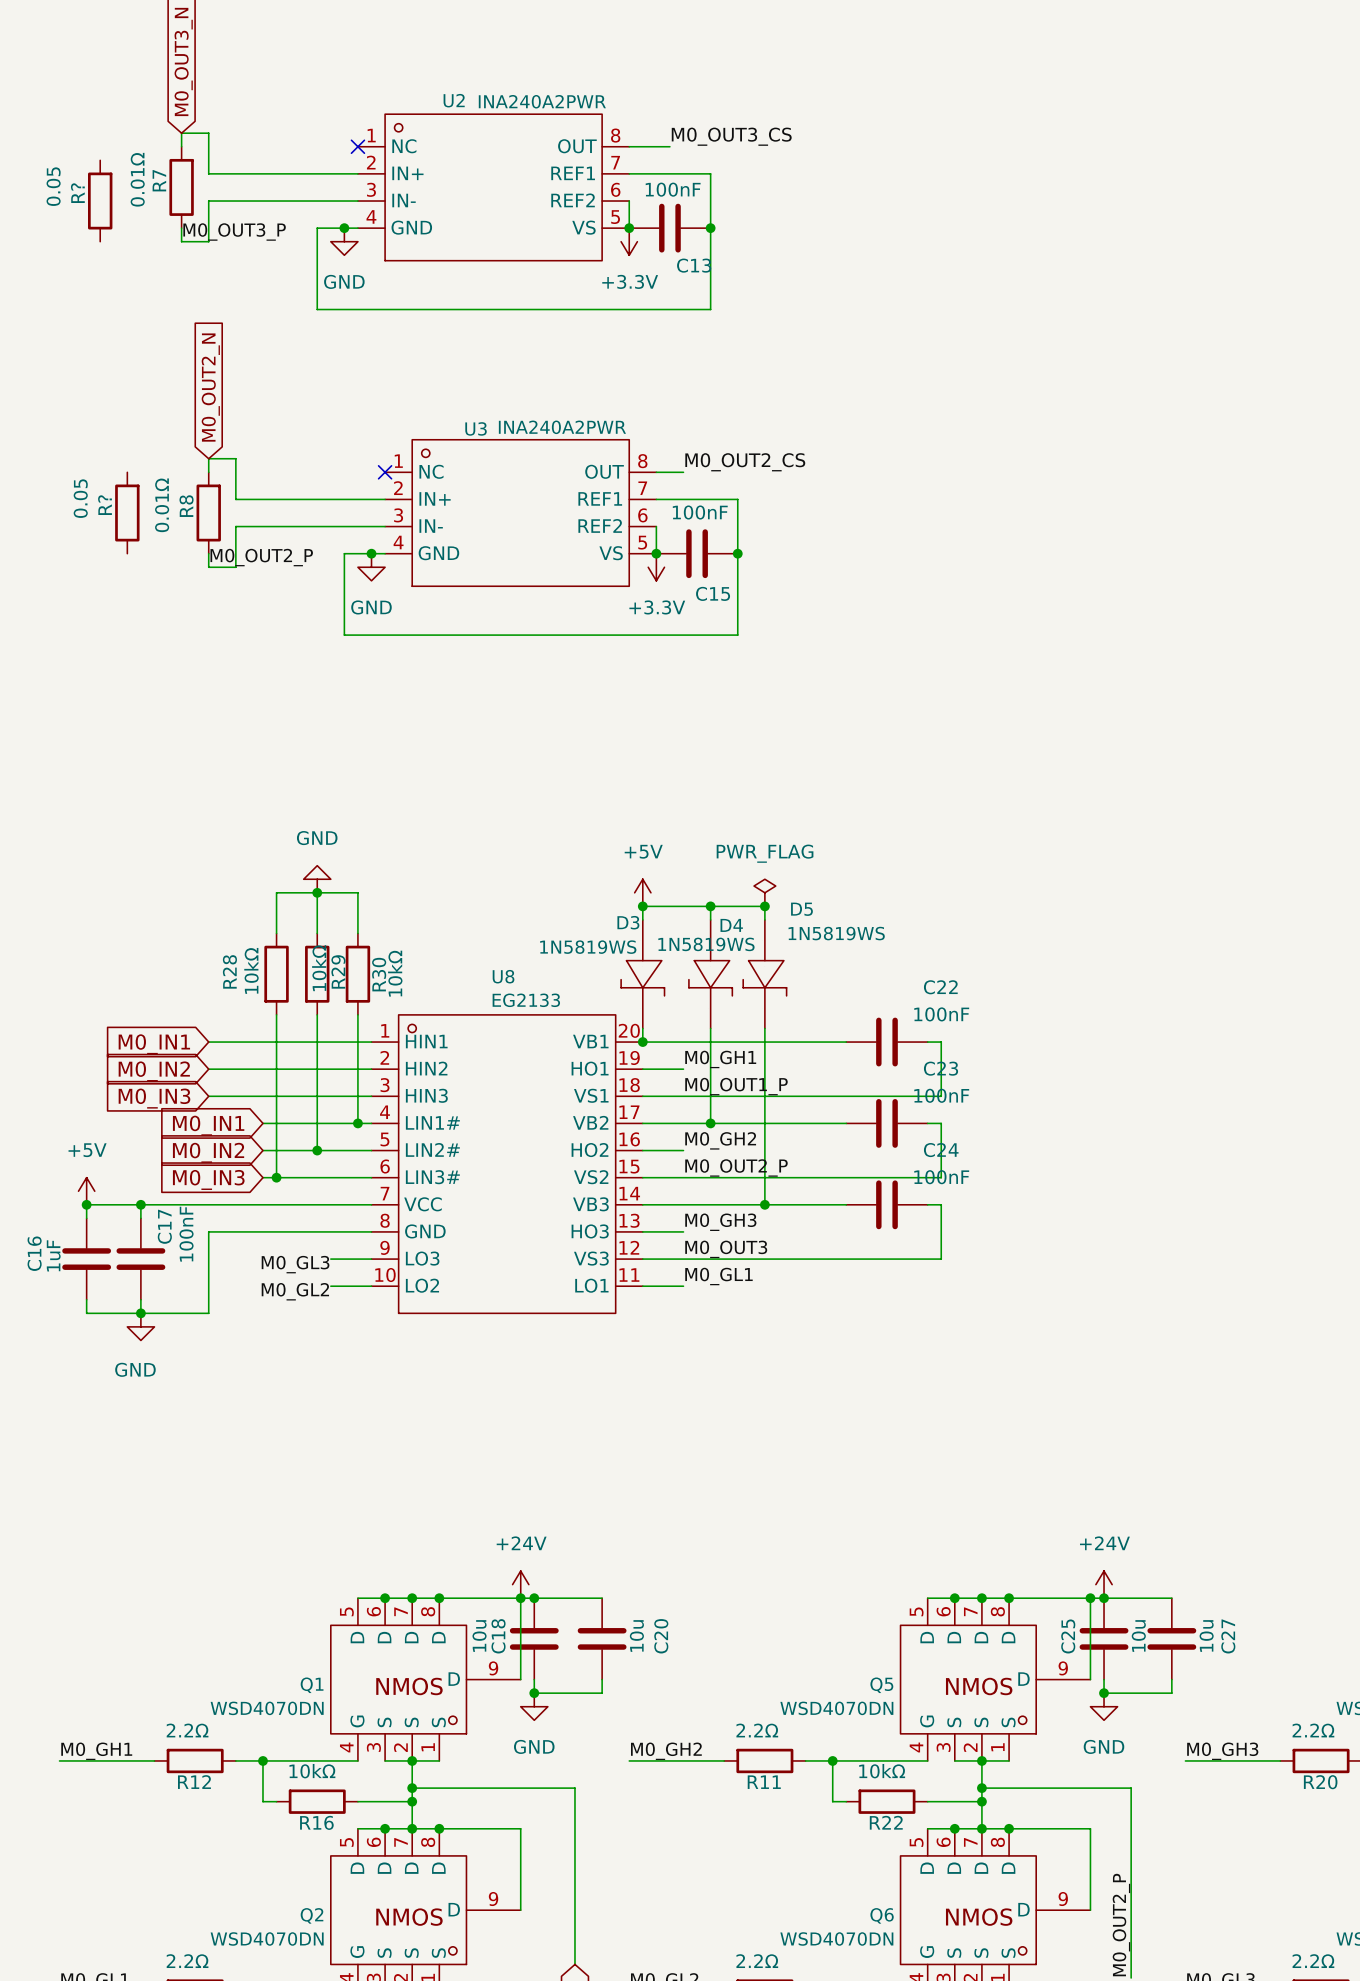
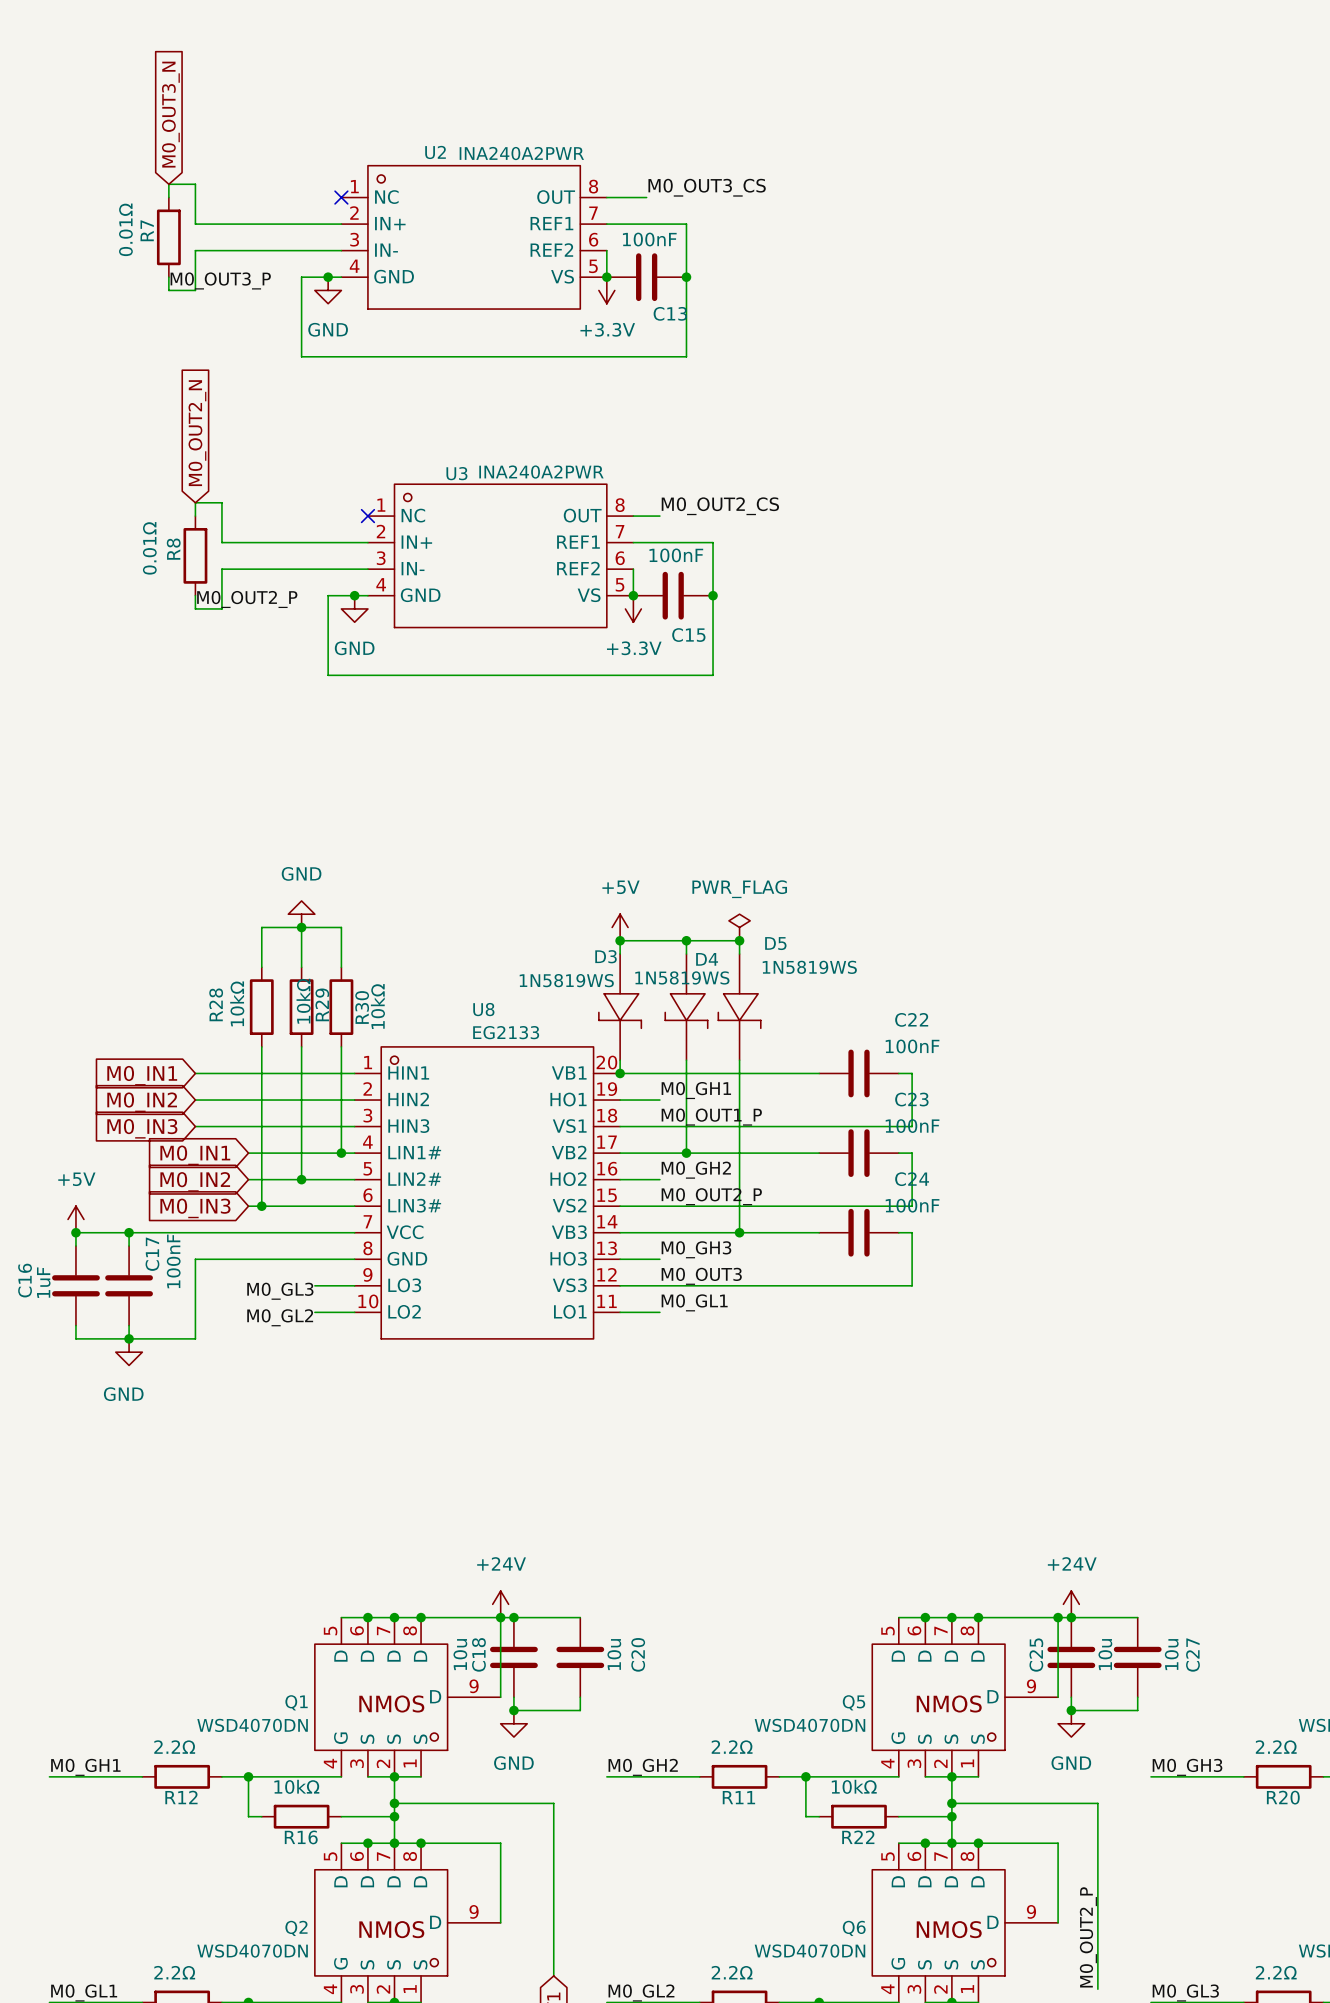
R?: 0.05 (100, 201) -> none
R?: 0.05 (127, 513) -> none

